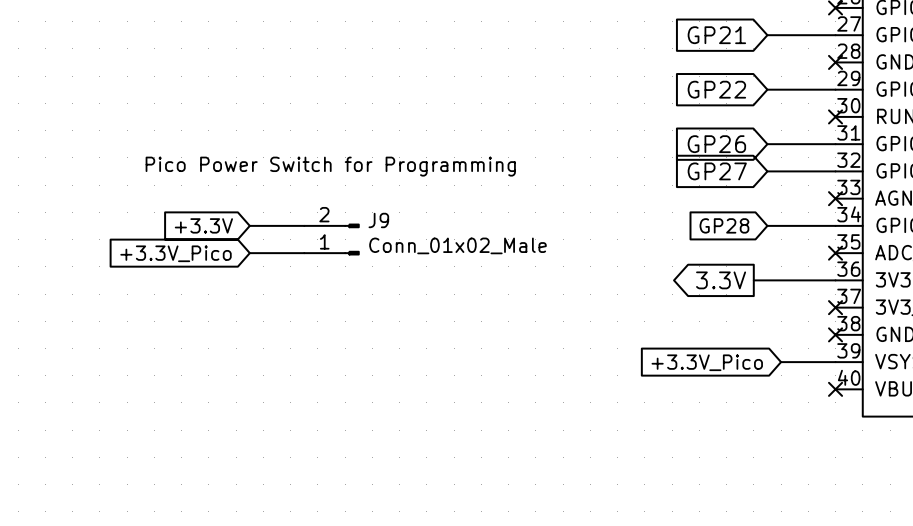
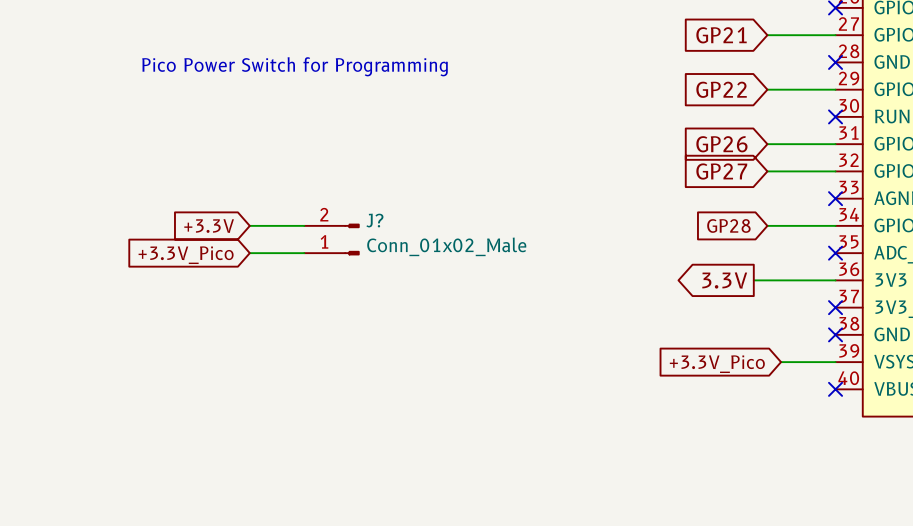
text position: Pico Power Switch for Programming (330, 166) -> Pico Power Switch for Programming (295, 66)
J9 name: J9 (378, 220) -> J? (374, 220)

